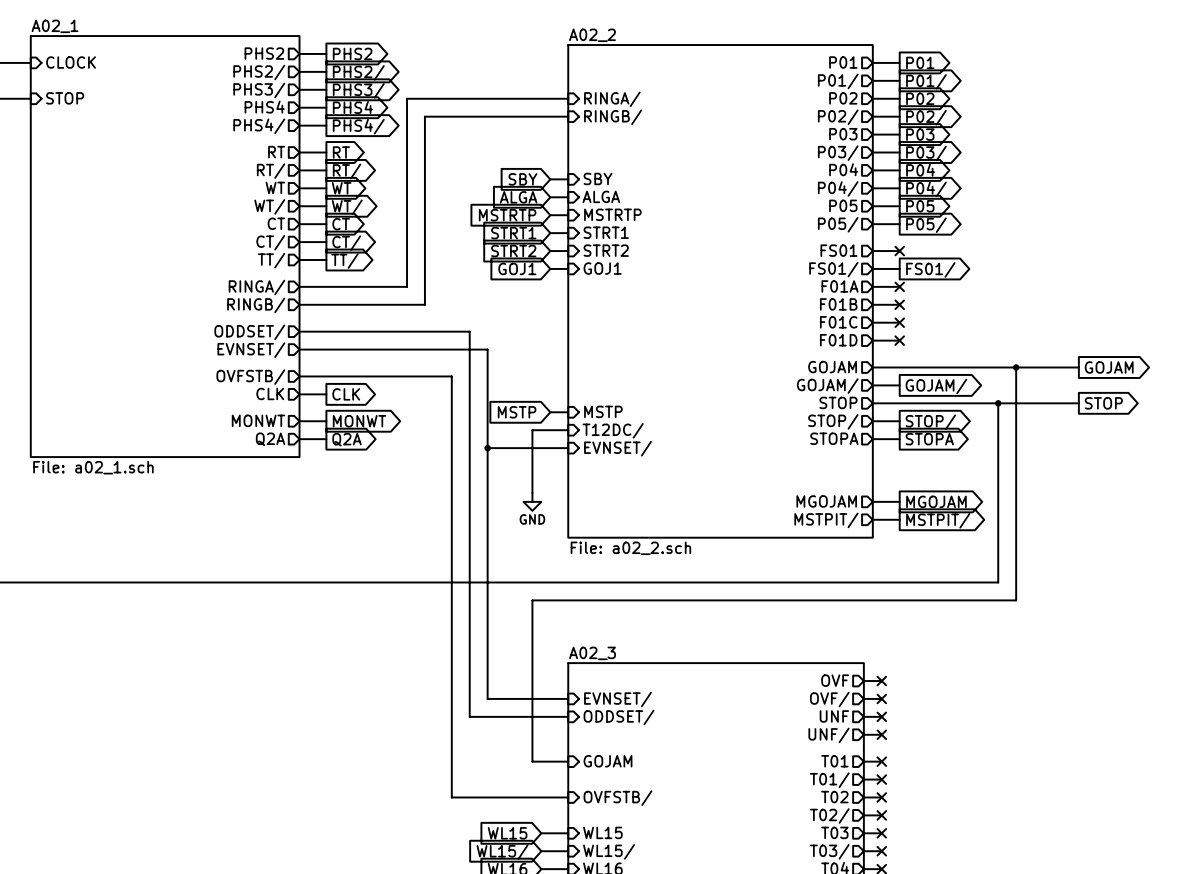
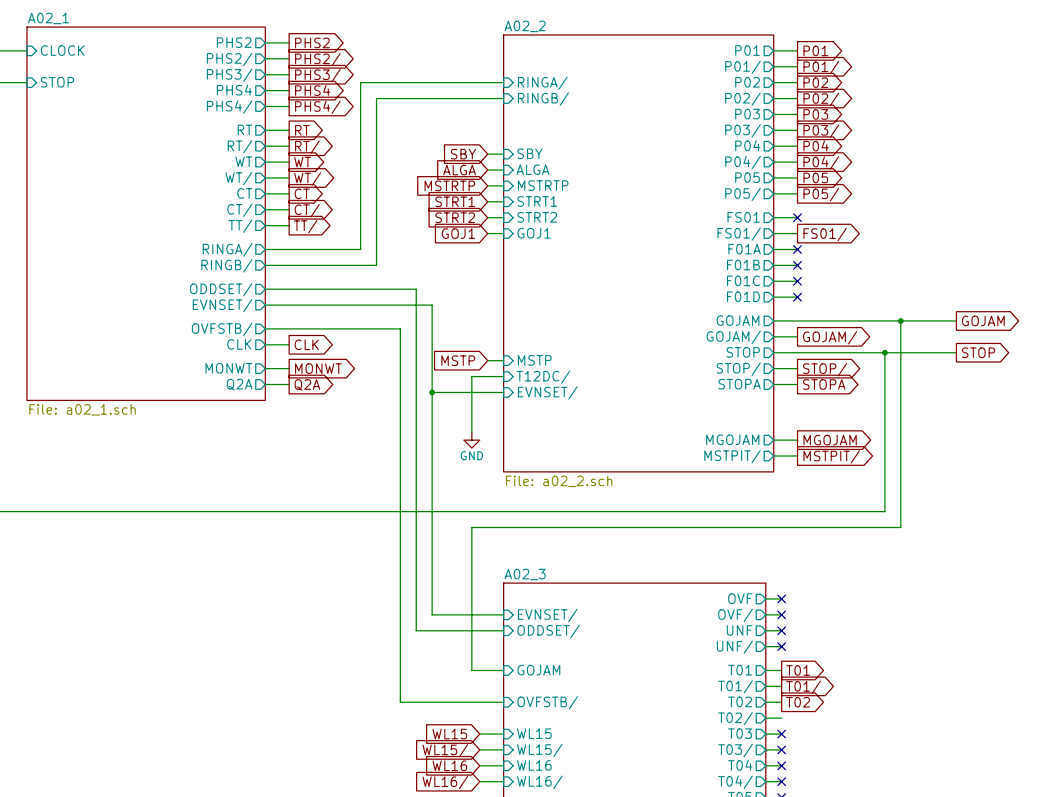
no-connect mark: (881, 761) -> none
global label: none -> T01 (798, 670)
no-connect mark: (881, 779) -> none
global label: none -> T01/ (803, 687)
no-connect mark: (881, 797) -> none
global label: none -> T02 (798, 702)
no-connect mark: (881, 815) -> none

